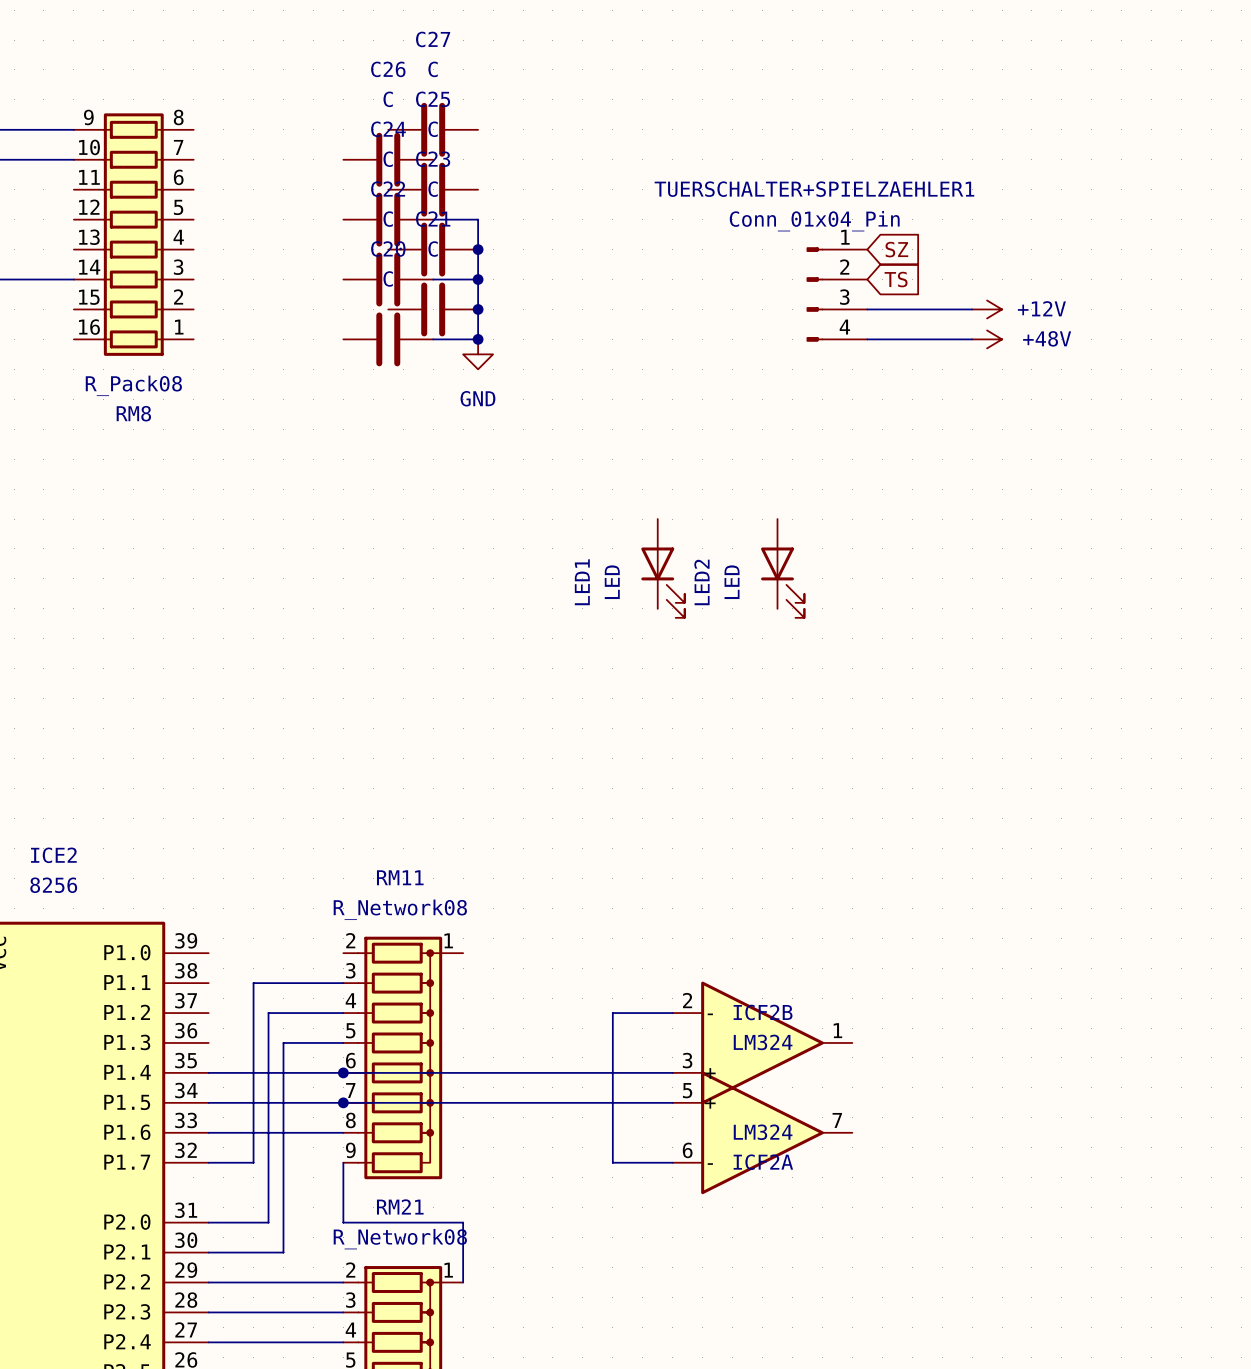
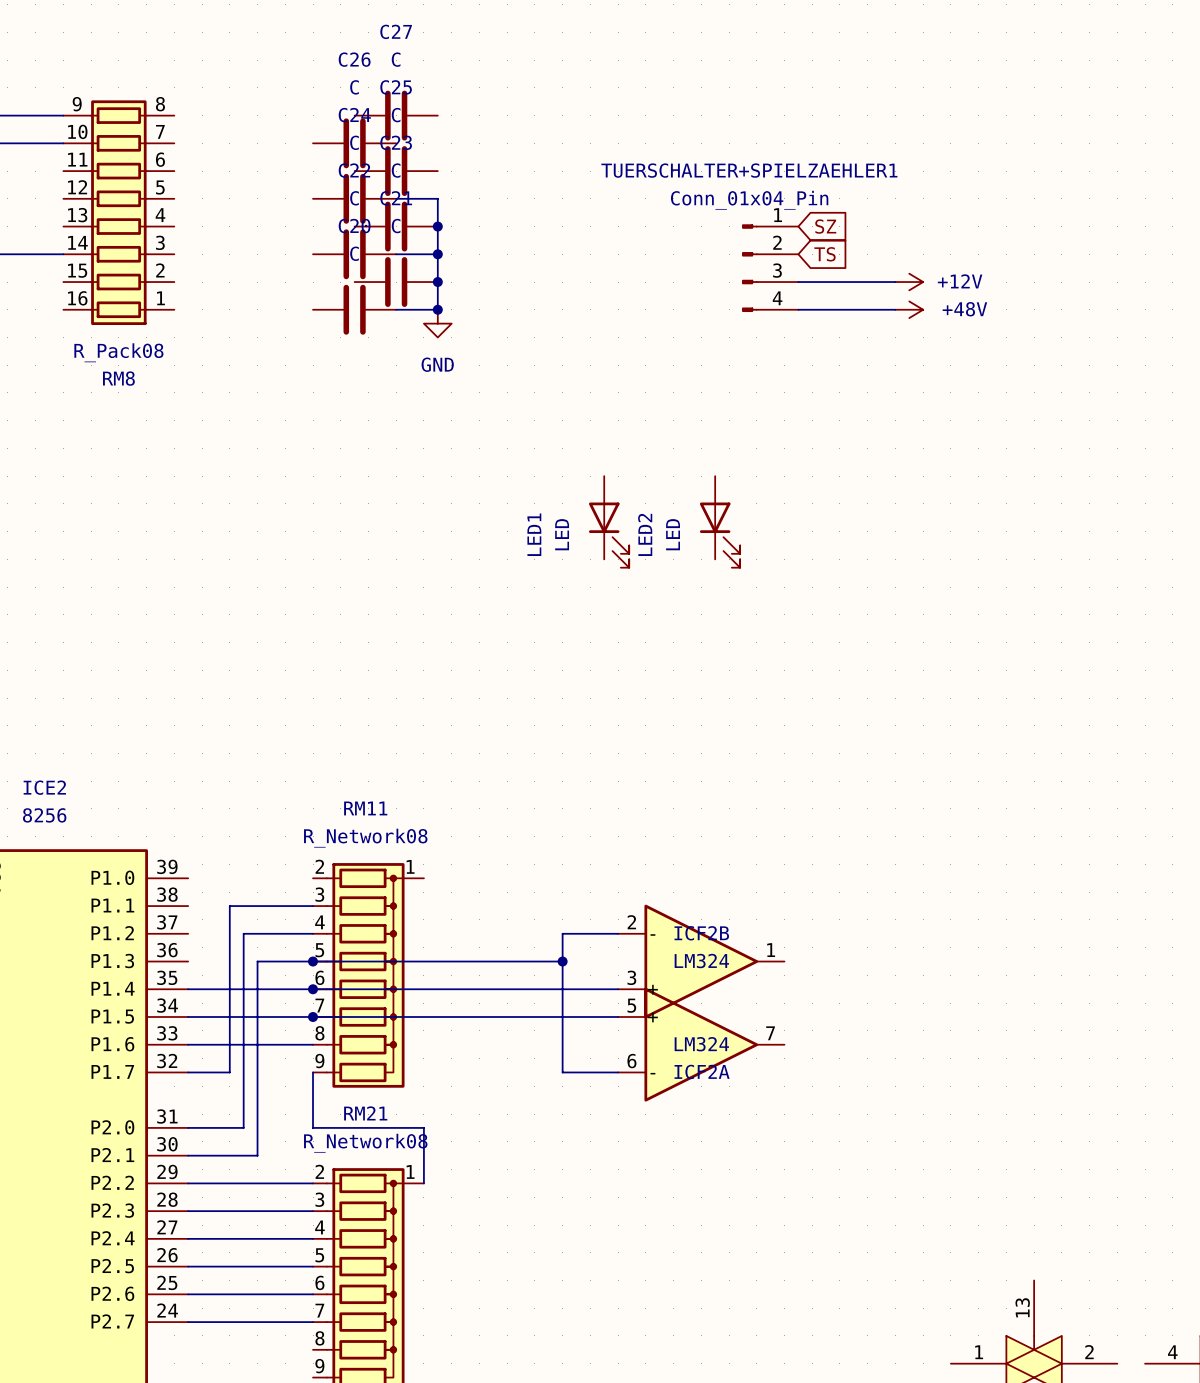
wire: none -> (313, 961) (562, 961)
junction: none -> (313, 961)
junction: none -> (562, 961)

